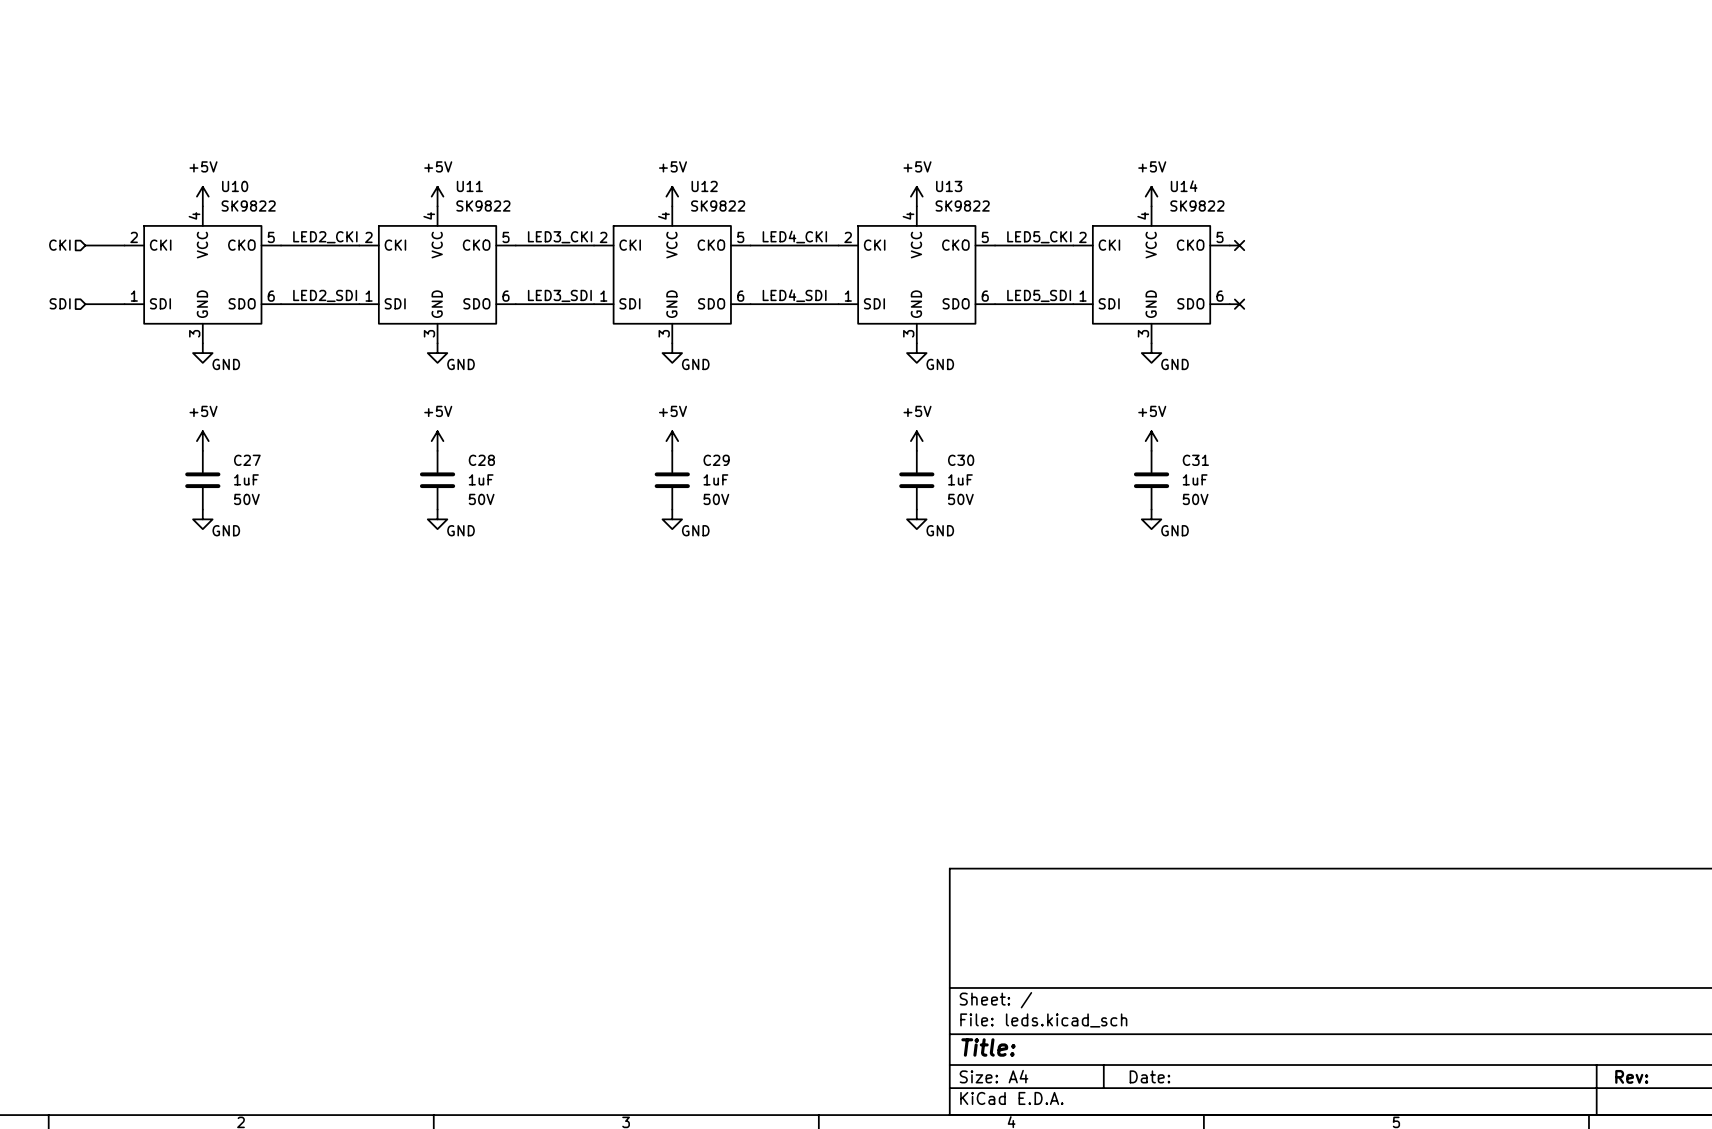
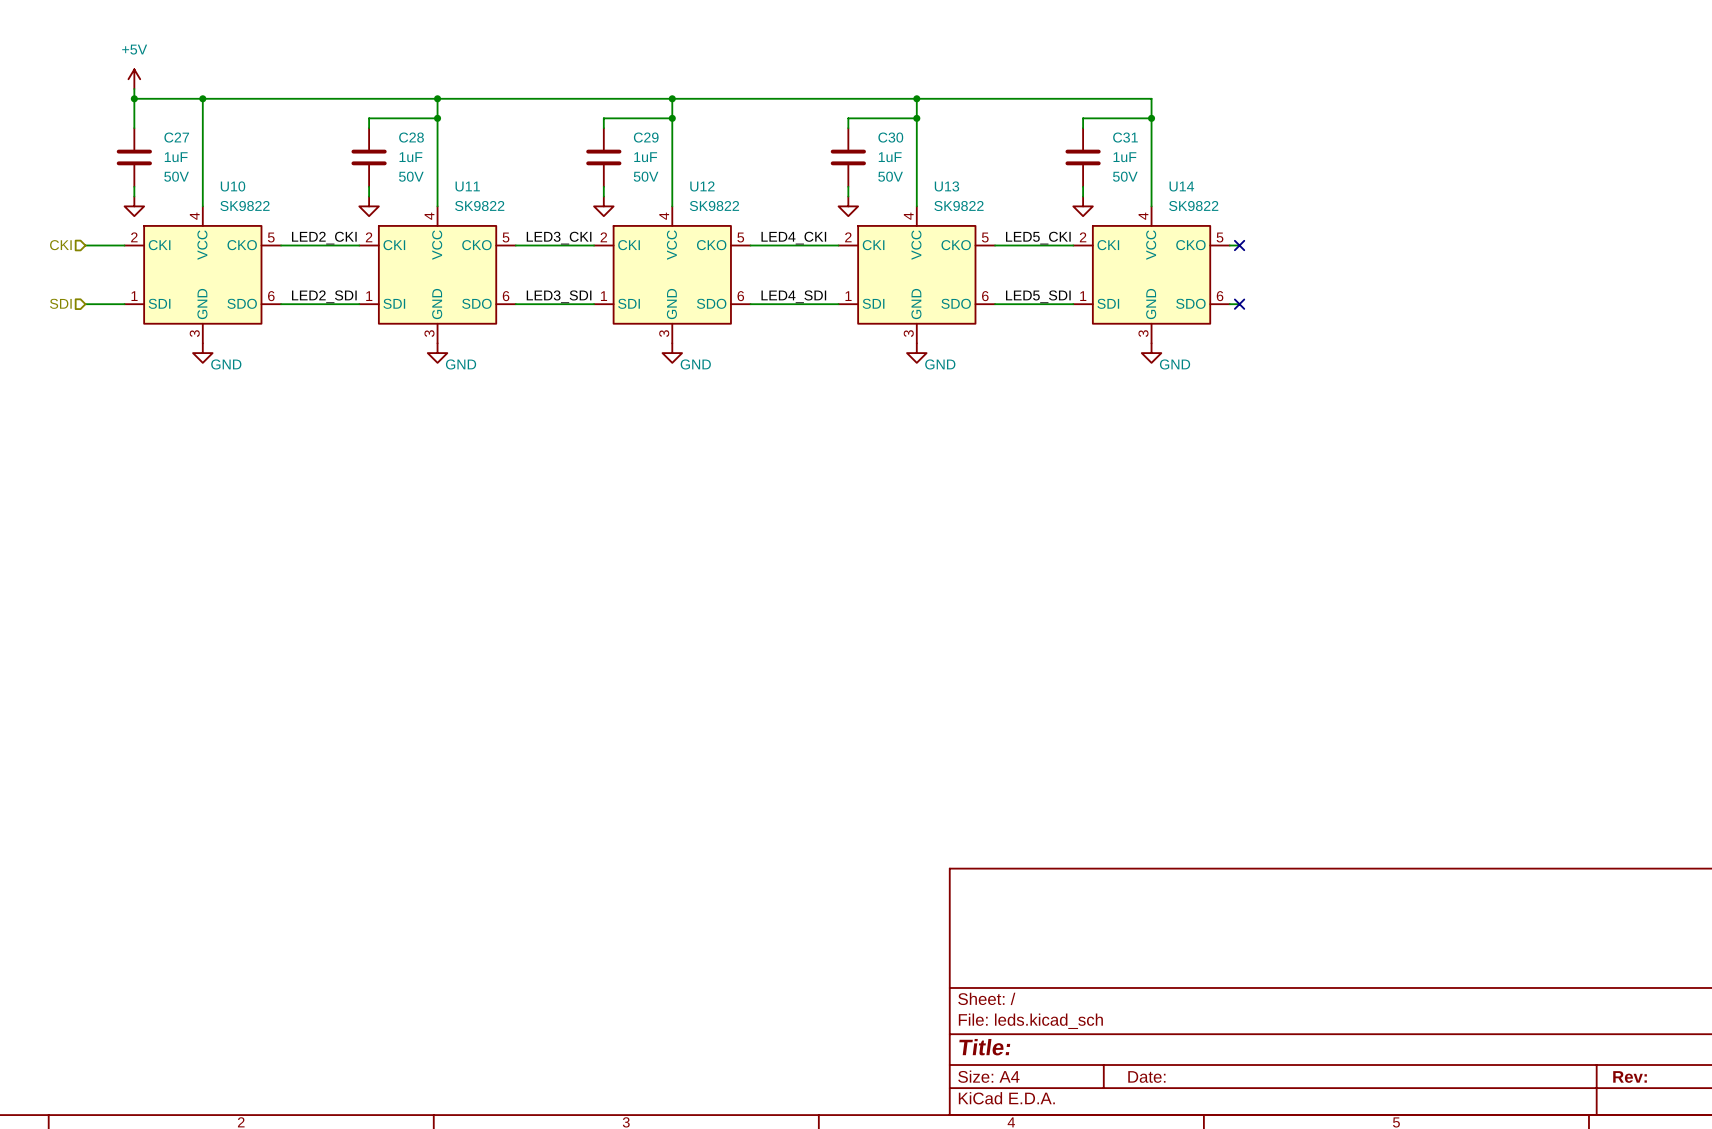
wire: none -> (134, 89) (134, 128)
wire: none -> (134, 98) (1151, 98) (1151, 206)
junction: none -> (134, 98)
wire: none -> (202, 98) (202, 206)
junction: none -> (202, 98)
wire: none -> (437, 98) (437, 206)
junction: none -> (437, 98)
wire: none -> (672, 98) (672, 206)
junction: none -> (672, 98)
wire: none -> (916, 98) (916, 206)
junction: none -> (916, 98)
wire: none -> (437, 118) (369, 118) (369, 128)
junction: none -> (437, 118)
wire: none -> (672, 118) (603, 118) (603, 128)
junction: none -> (672, 118)
wire: none -> (916, 118) (848, 118) (848, 128)
junction: none -> (916, 118)
wire: none -> (1151, 118) (1083, 118) (1083, 128)
junction: none -> (1151, 118)
wire: none -> (134, 186) (134, 196)
wire: none -> (369, 186) (369, 196)
wire: none -> (603, 186) (603, 196)
wire: none -> (848, 186) (848, 196)
wire: none -> (1083, 186) (1083, 196)
power symbol position: +5V (202, 196) -> +5V (134, 79)
power symbol: +5V (437, 196) -> none
power symbol: +5V (672, 196) -> none
power symbol: +5V (916, 196) -> none
power symbol: +5V (1151, 196) -> none
power symbol: none -> (134, 206)
power symbol: none -> (369, 206)
power symbol: none -> (603, 206)
power symbol: none -> (848, 206)
power symbol: none -> (1083, 206)
power symbol: +5V (202, 441) -> none
power symbol: +5V (437, 441) -> none
power symbol: +5V (672, 441) -> none
power symbol: +5V (916, 441) -> none
power symbol: +5V (1151, 441) -> none
C27 position: (202, 480) -> (134, 157)
C28 position: (437, 480) -> (369, 157)
C29 position: (672, 480) -> (603, 157)
C30 position: (916, 480) -> (848, 157)
C31 position: (1151, 480) -> (1083, 157)
power symbol: GND (202, 519) -> none
power symbol: GND (437, 519) -> none
power symbol: GND (672, 519) -> none
power symbol: GND (916, 519) -> none
power symbol: GND (1151, 519) -> none

